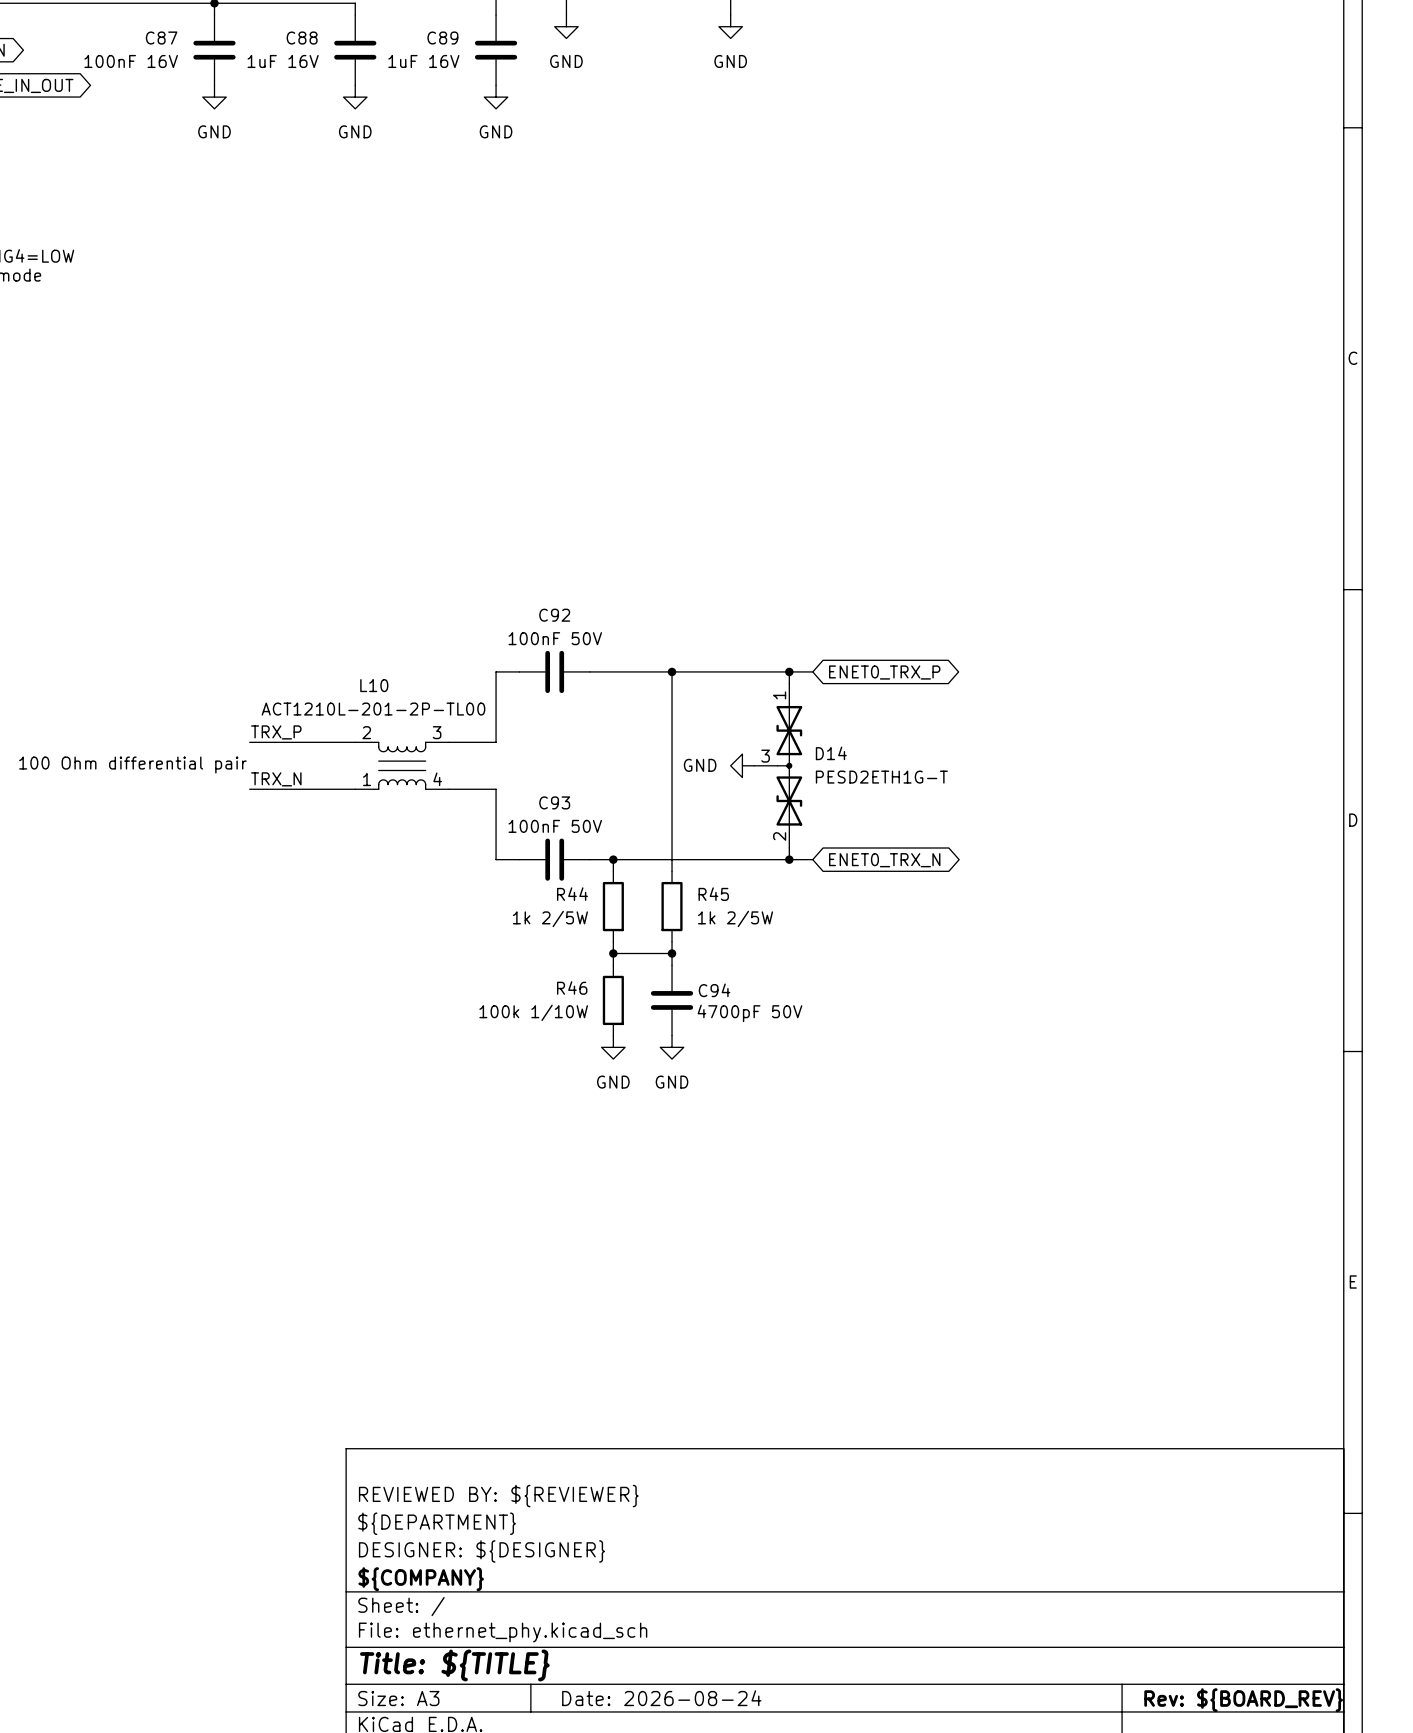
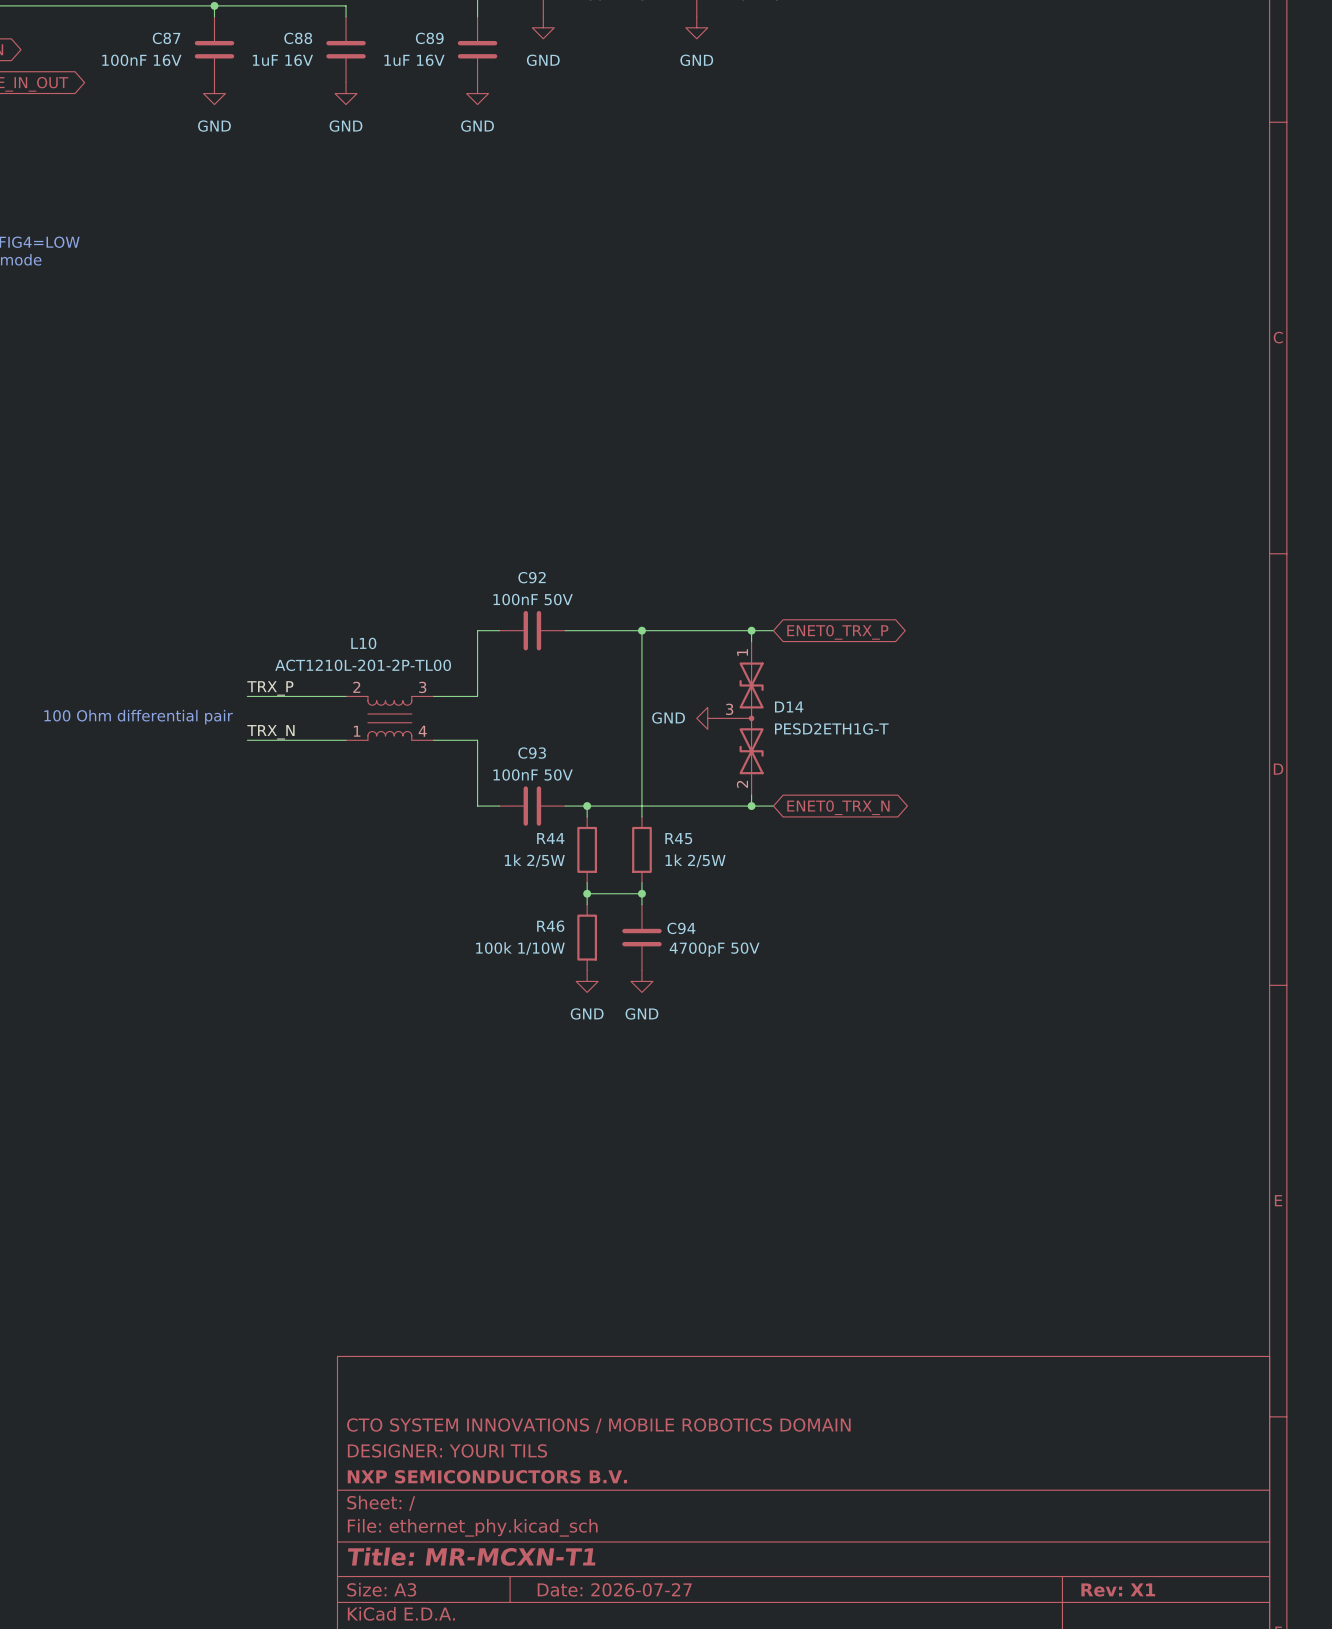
title block: REVIEWED BY: ${REVIEWER} (498, 1496) -> none
title block: ${DEPARTMENT} (437, 1523) -> CTO SYSTEM INNOVATIONS / MOBILE ROBOTICS DOMAIN (598, 1425)
title block: DESIGNER: ${DESIGNER} (481, 1551) -> DESIGNER: YOURI TILS (447, 1450)
title block: ${COMPANY} (421, 1579) -> NXP SEMICONDUCTORS B.V. (487, 1476)
title block: Title: ${TITLE} (454, 1665) -> Title: MR-MCXN-T1 (471, 1556)
title block: Date: 2026-08-24 (661, 1698) -> Date: 2026-07-27 (614, 1589)
title block: Rev: ${BOARD_REV} (1243, 1700) -> Rev: X1 (1118, 1589)

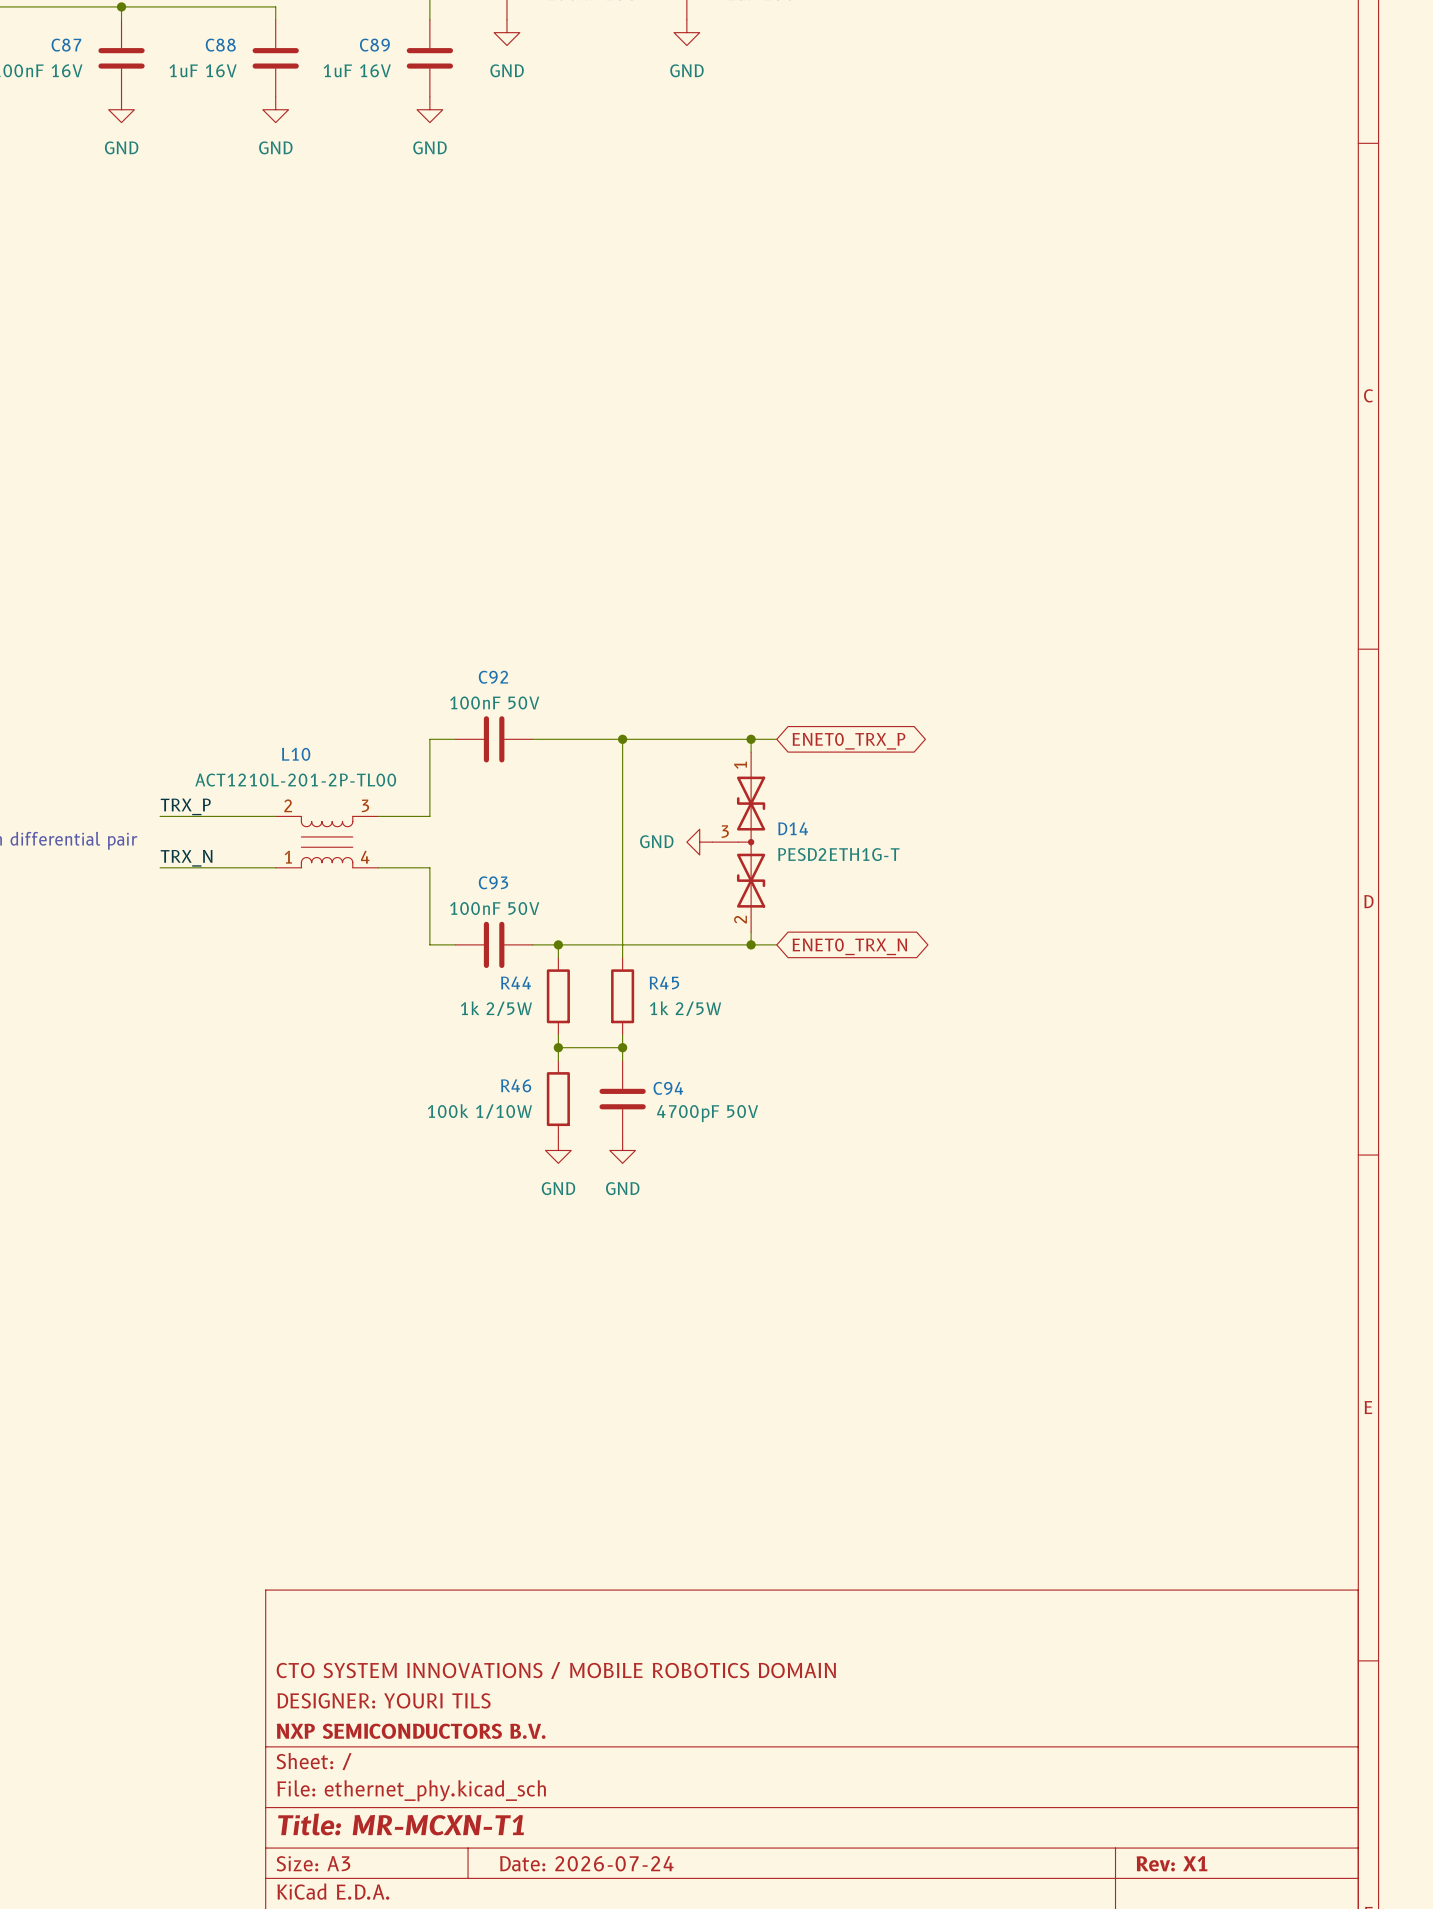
title block: Date: 2026-07-27 (614, 1589) -> Date: 2026-07-24 (586, 1863)

